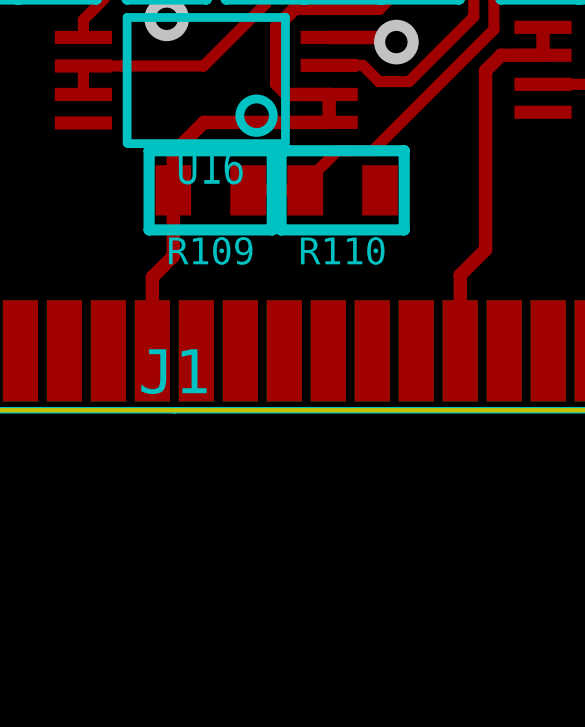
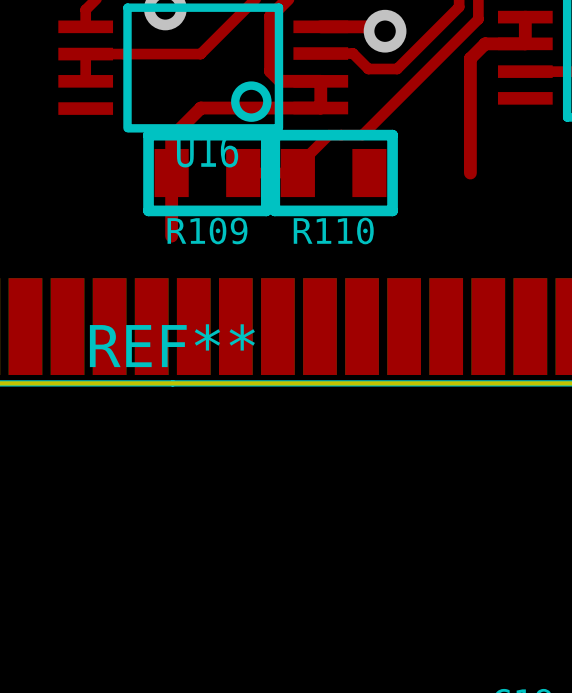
top track: (485, 190) (485, 249) (460, 274) (460, 350) -> none
top track: (173, 256) (152, 277) (152, 350) -> none
J1 name: J1 (173, 371) -> REF** (172, 345)

